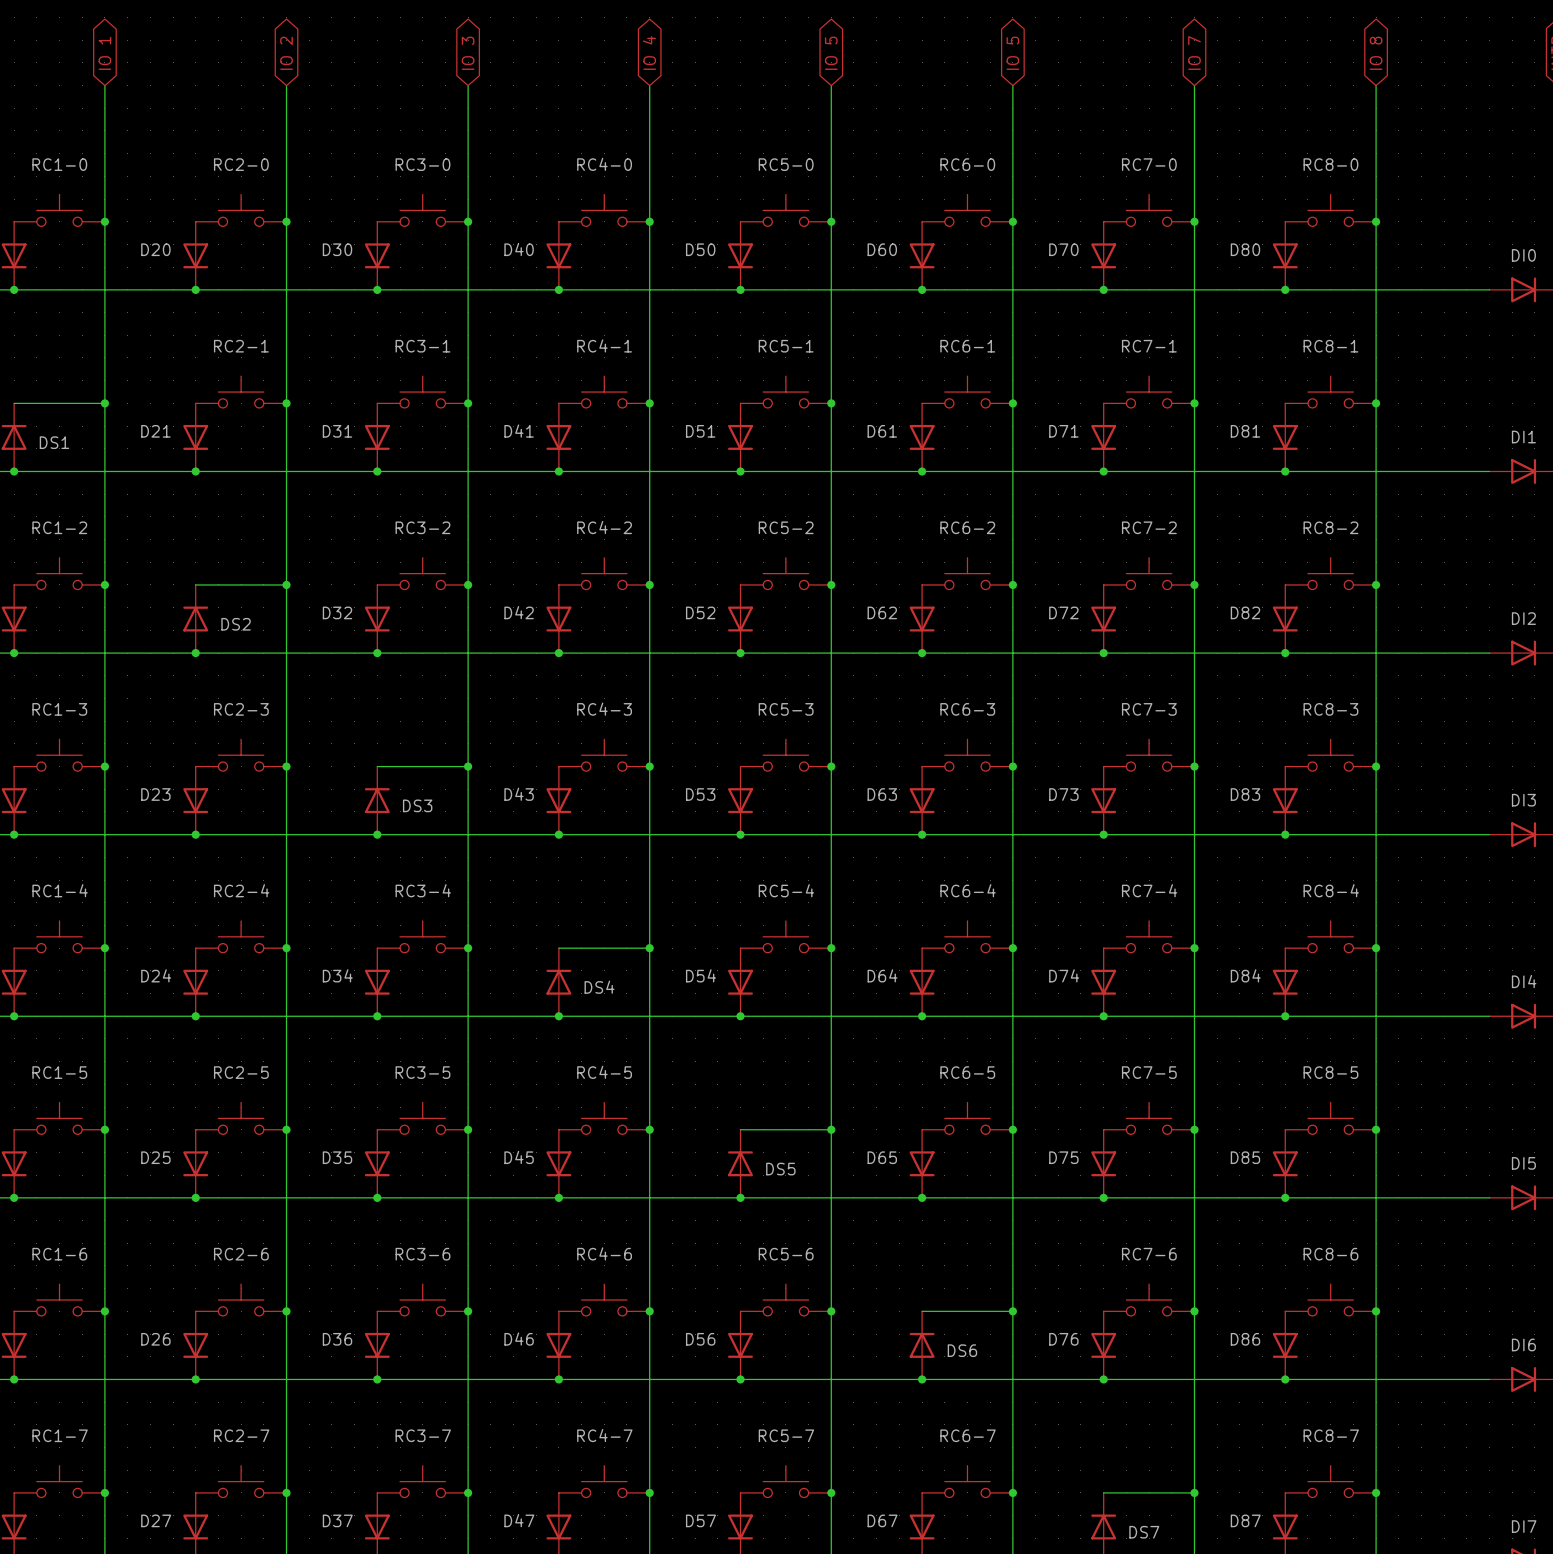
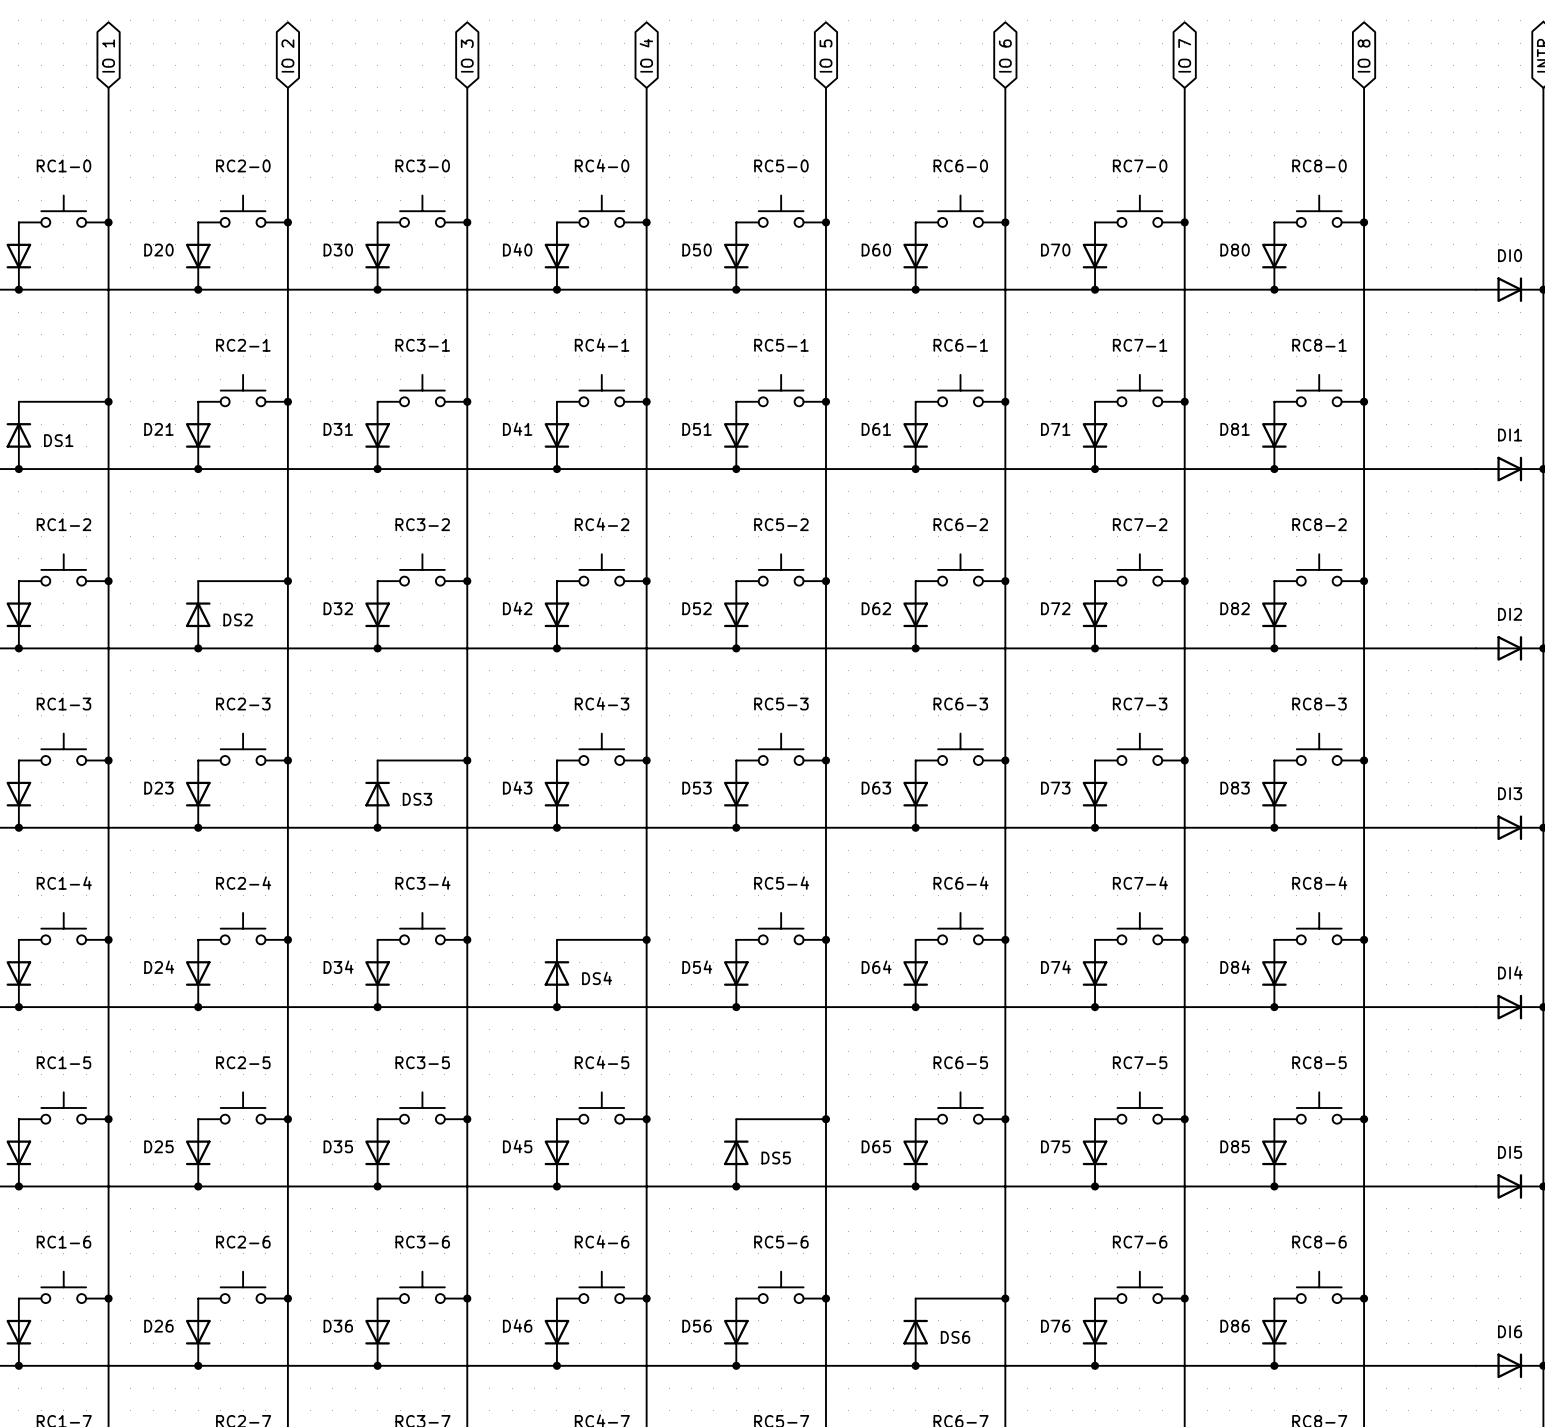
global label: IO 5 (1012, 53) -> IO 6 (1005, 56)

